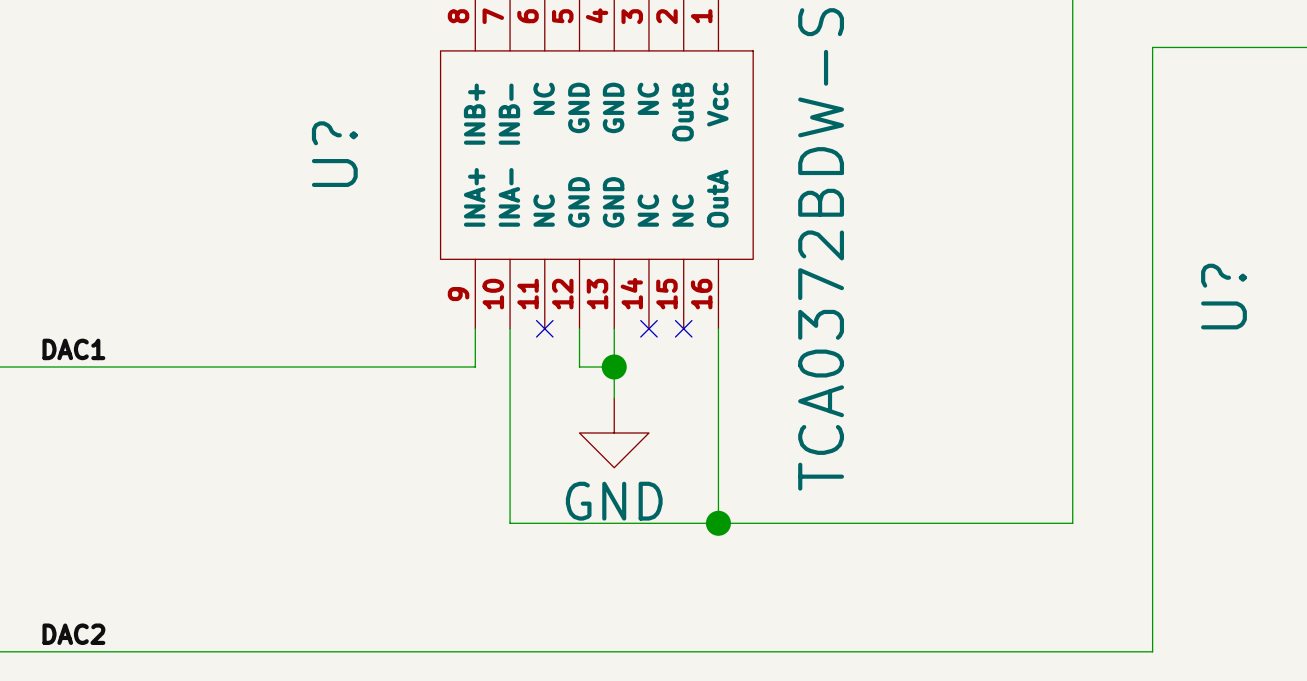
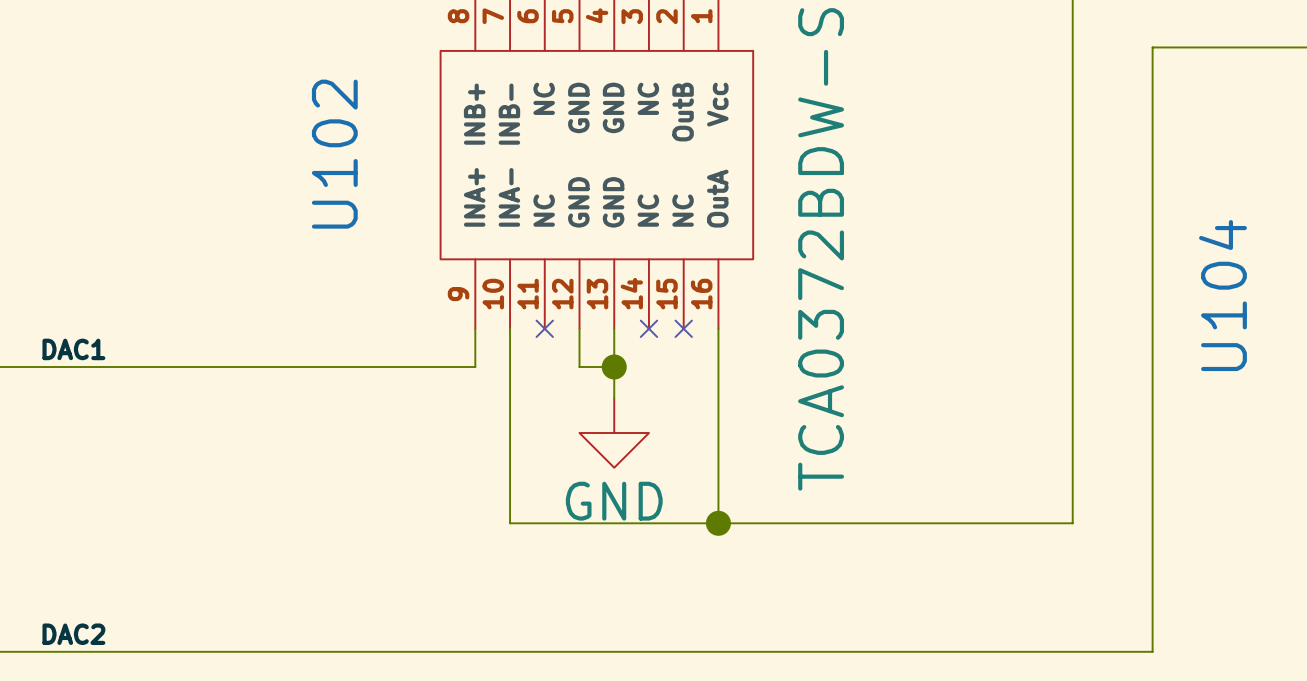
U? name: U? (334, 154) -> U102 (334, 154)
U? name: U? (1223, 296) -> U104 (1223, 295)

